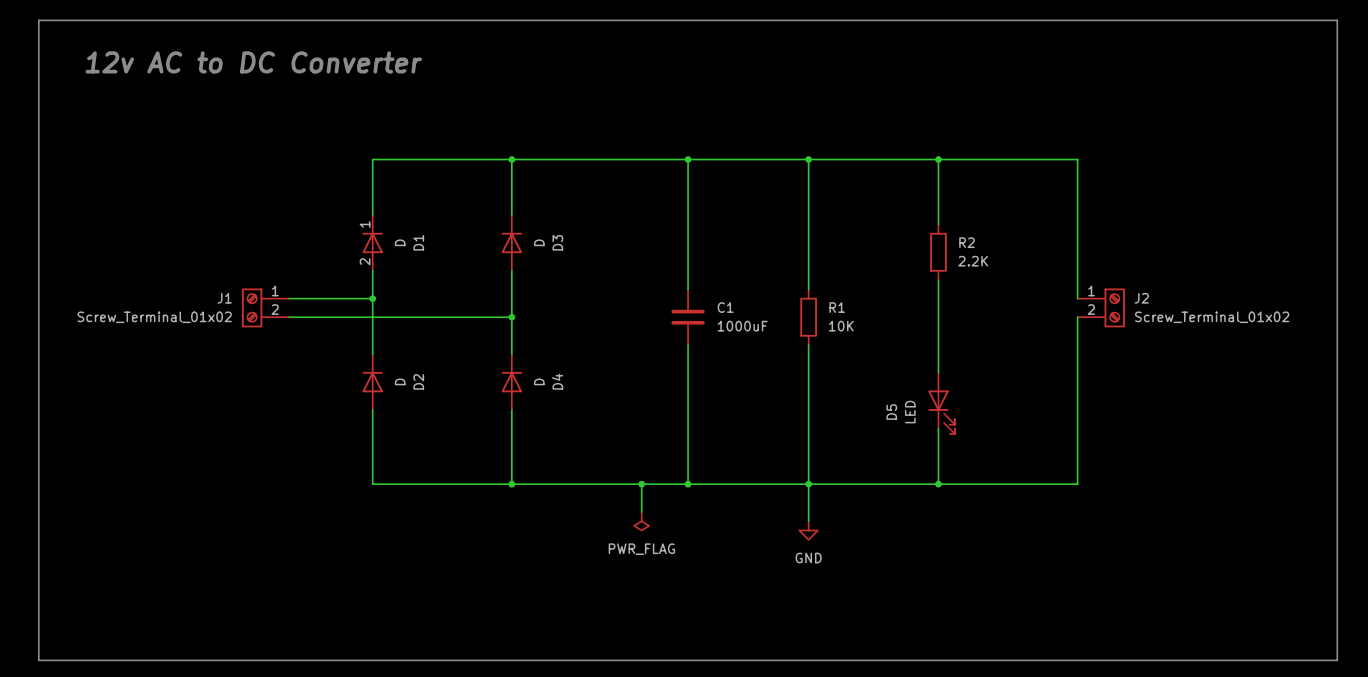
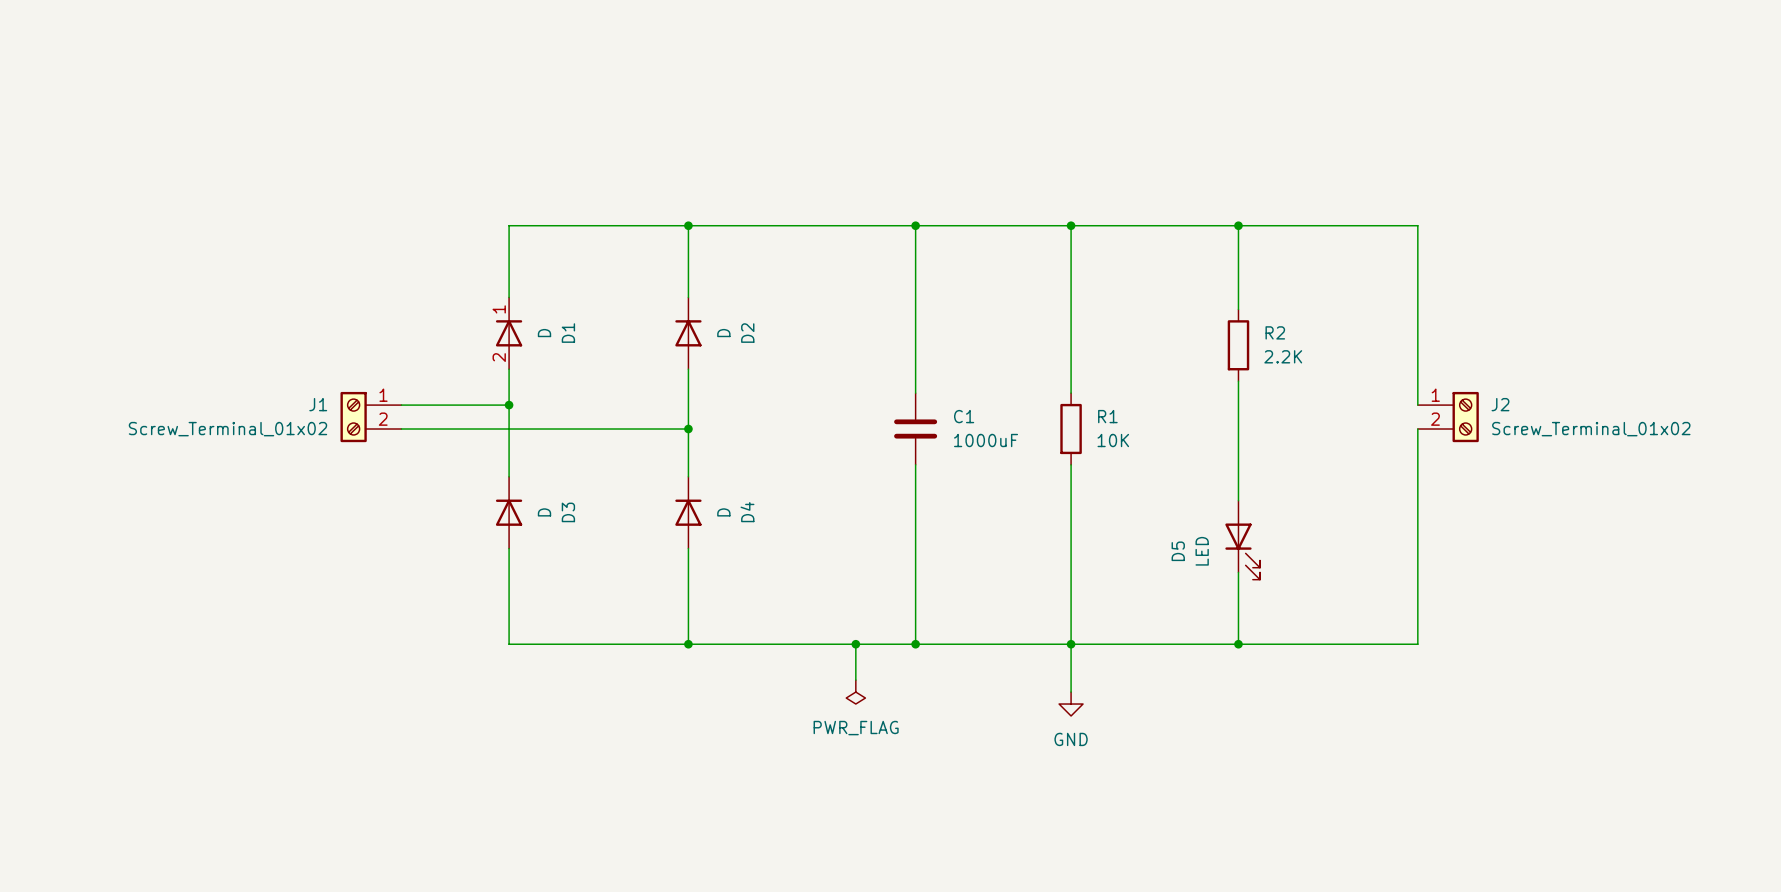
line: (38, 20) (1337, 20) (1337, 660) (38, 660) (38, 20) -> none
text: 12v AC to DC Converter (253, 62) -> none
D3 name: D3 (557, 242) -> D2 (747, 333)
D2 name: D2 (418, 381) -> D3 (568, 512)

